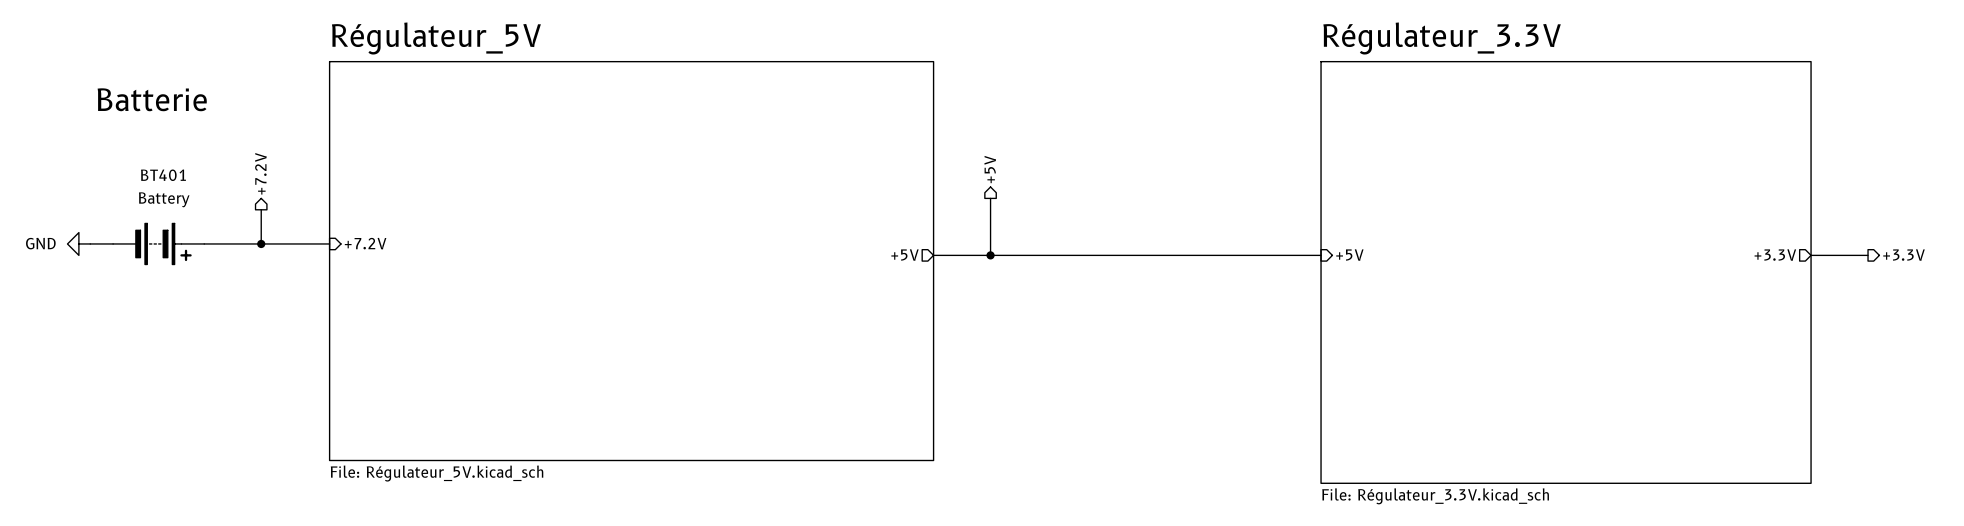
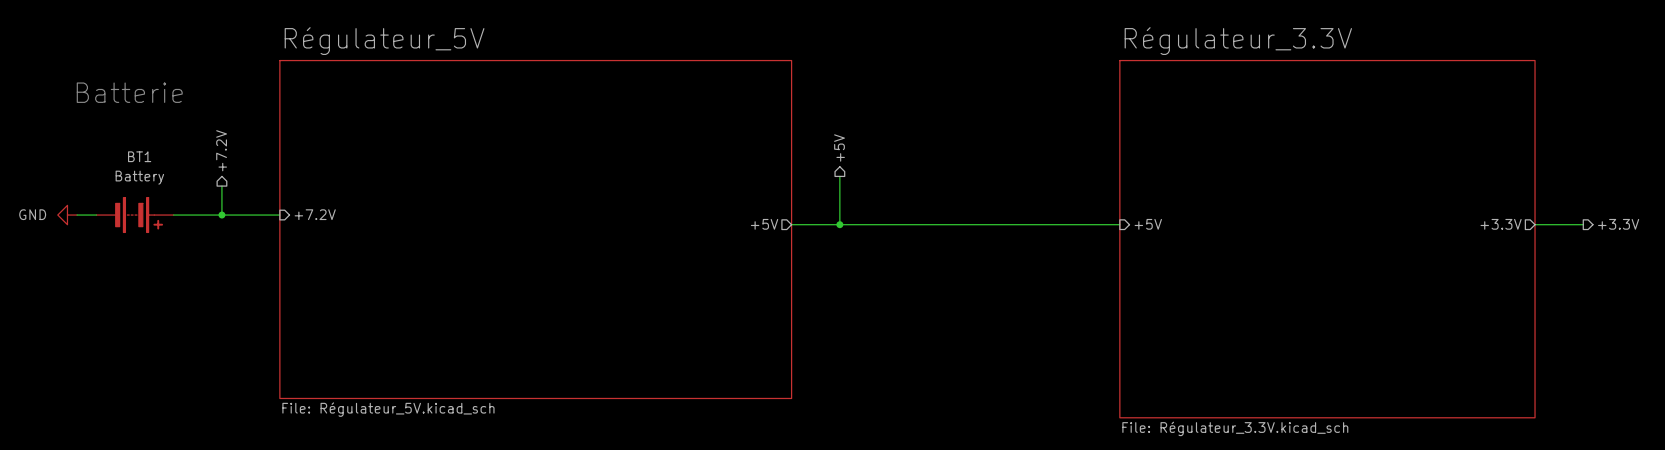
BT401 name: BT401 (163, 175) -> BT1 (139, 156)

